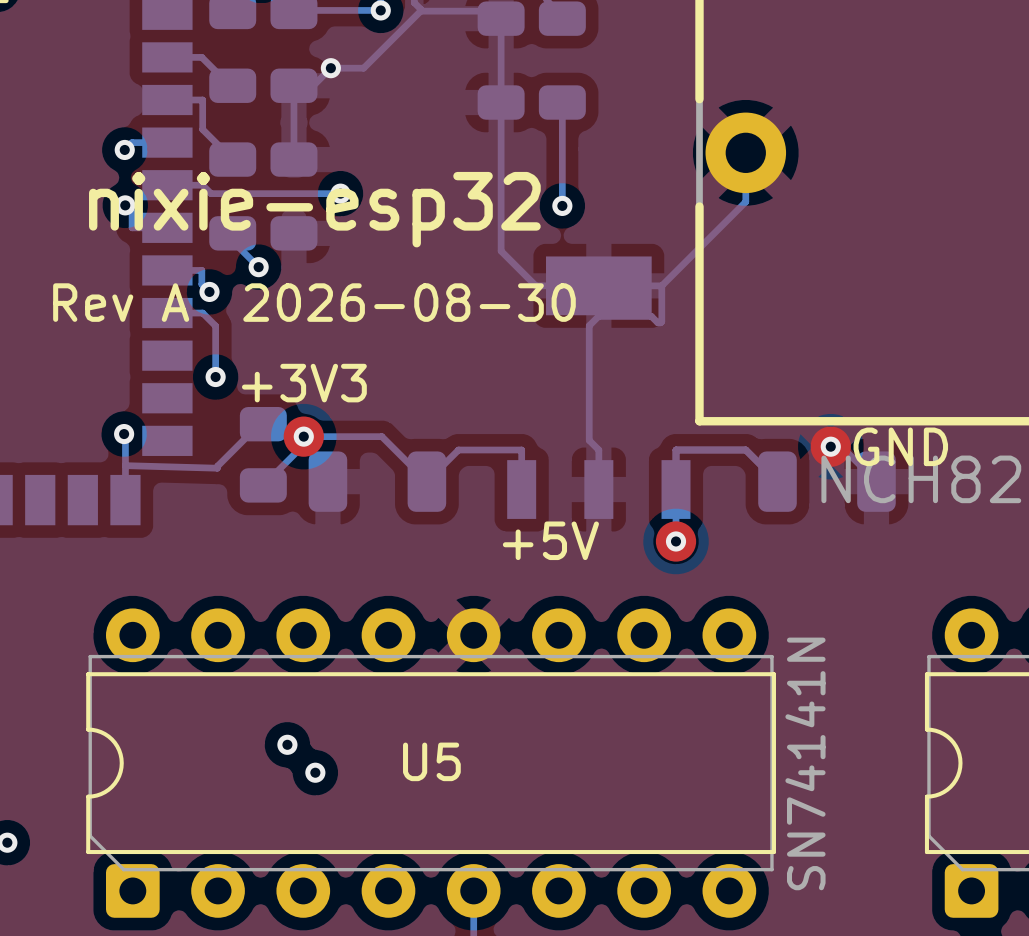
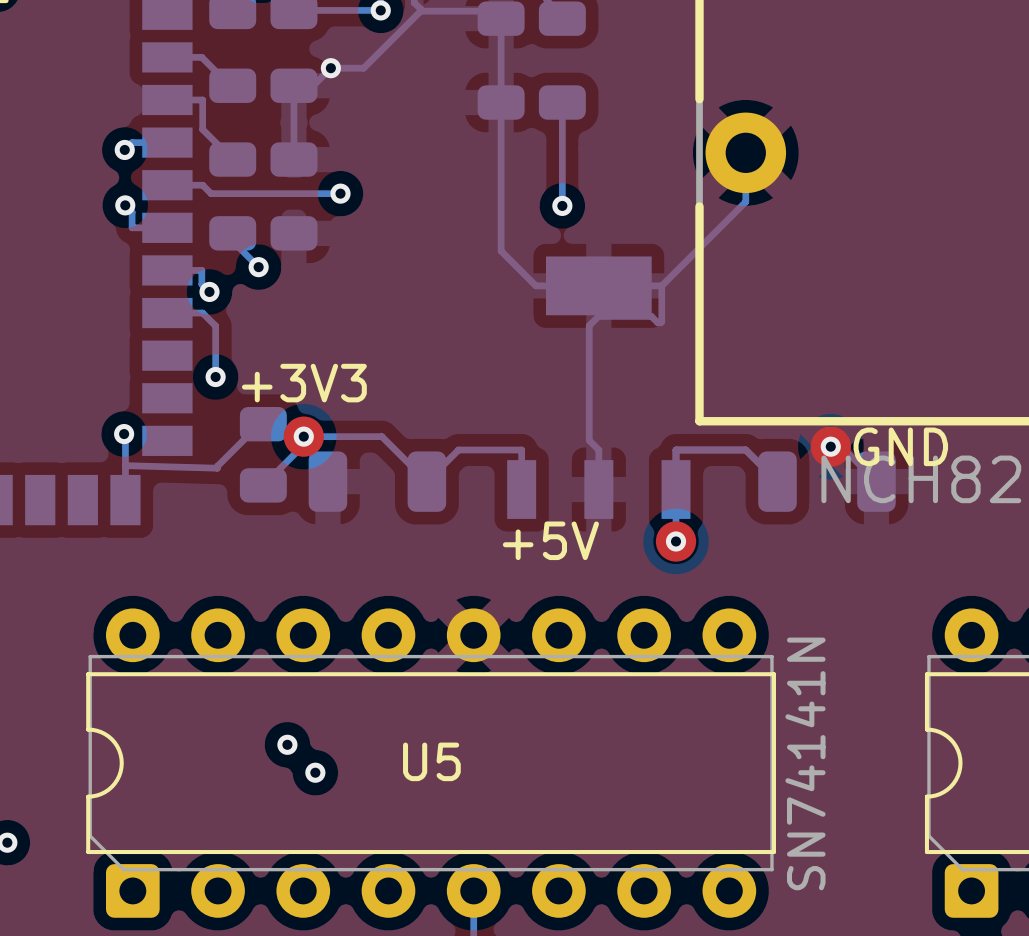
text: nixie-esp32 (314, 209) -> none
text: Rev A 2026-08-30 (314, 302) -> none

